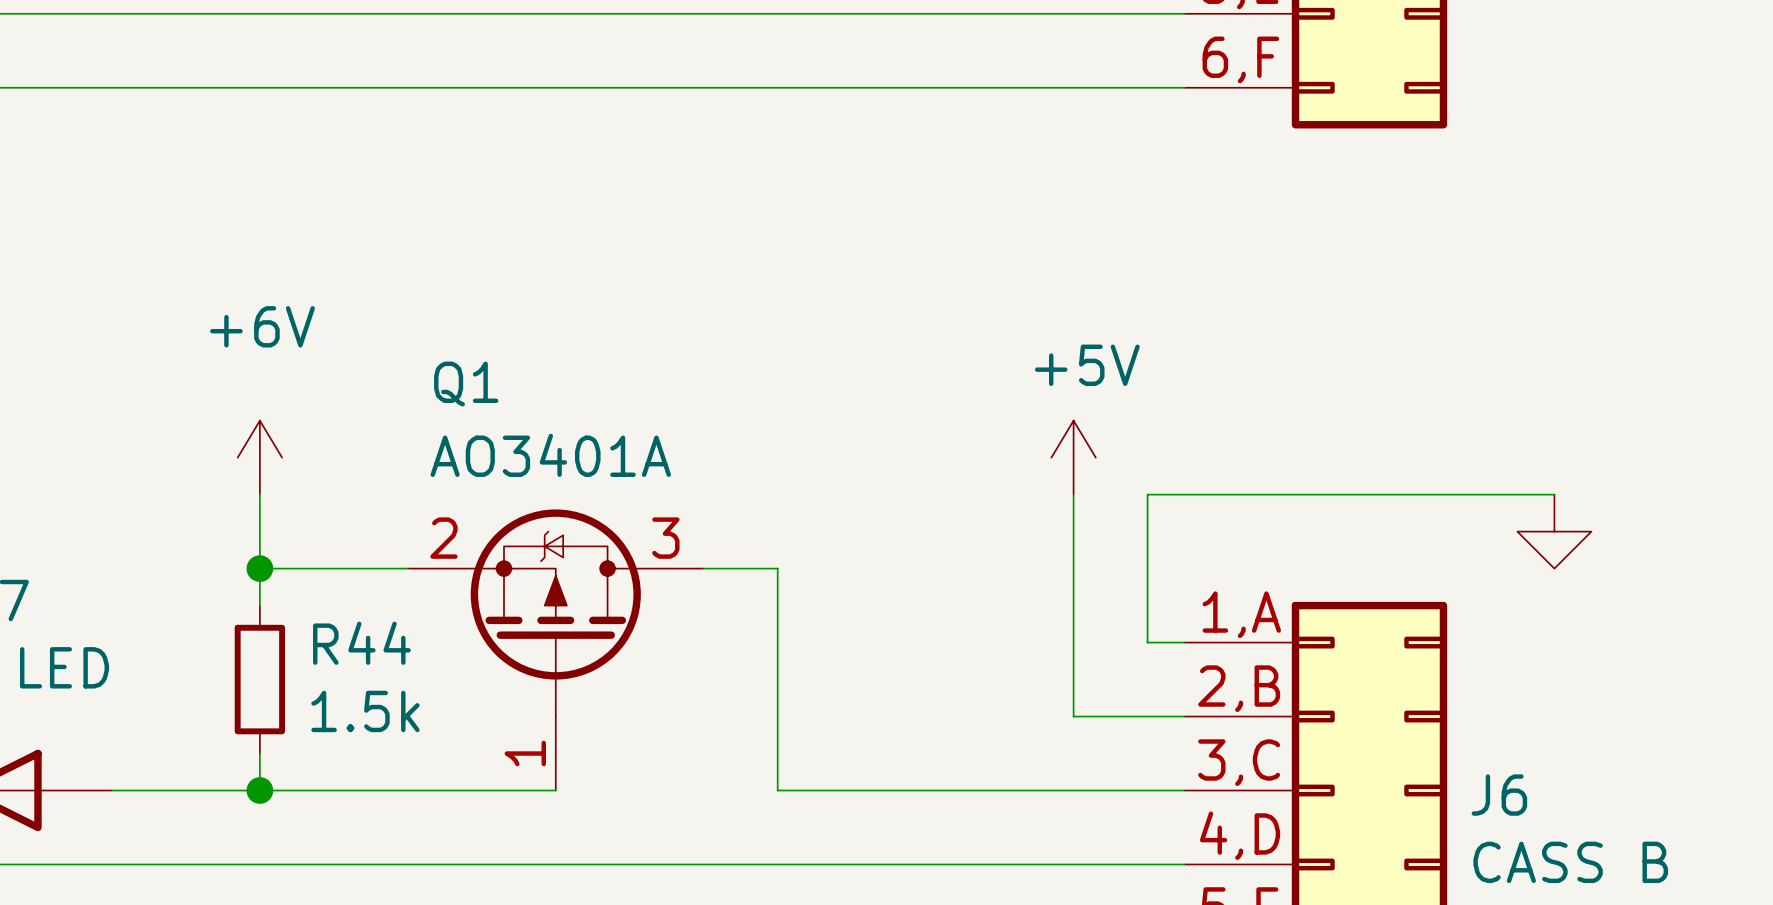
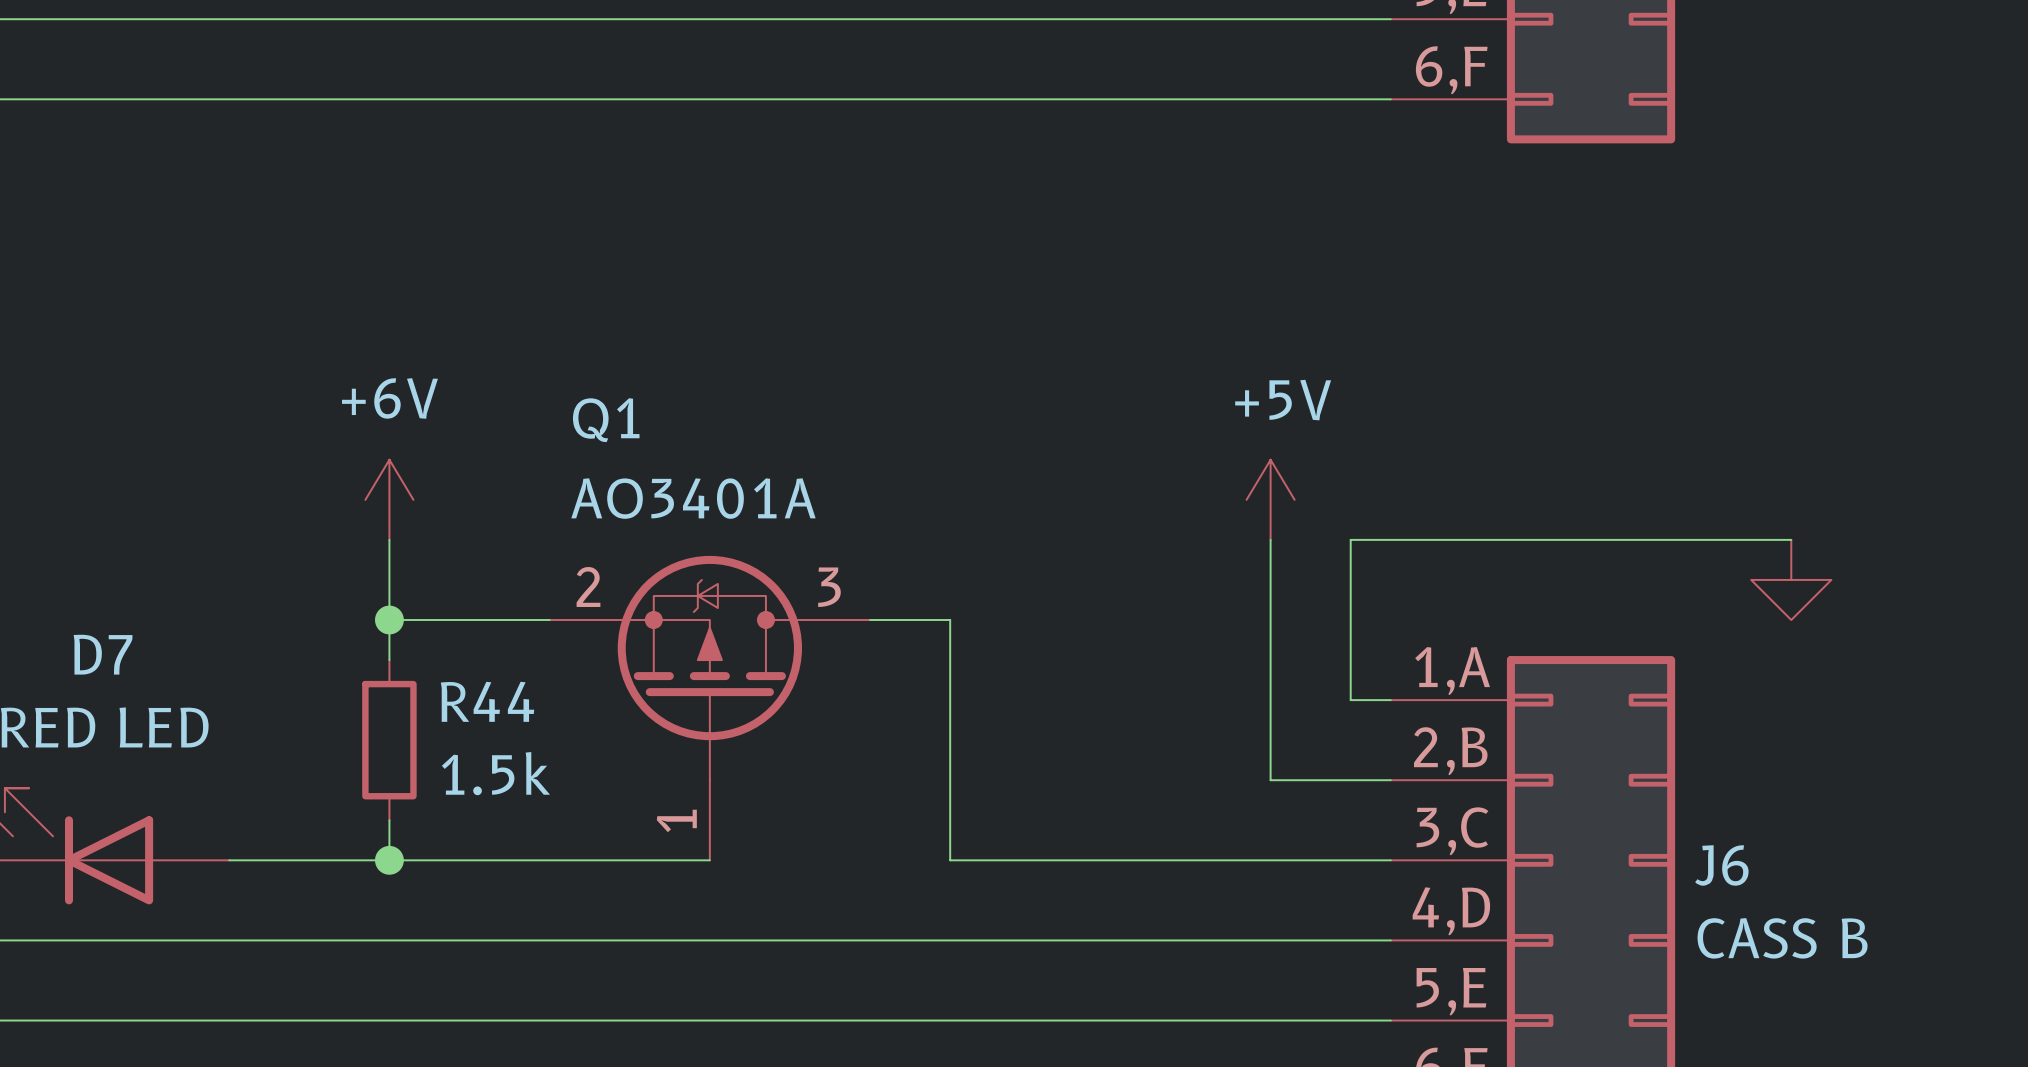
power symbol text position: +6V (262, 326) -> +6V (389, 398)

